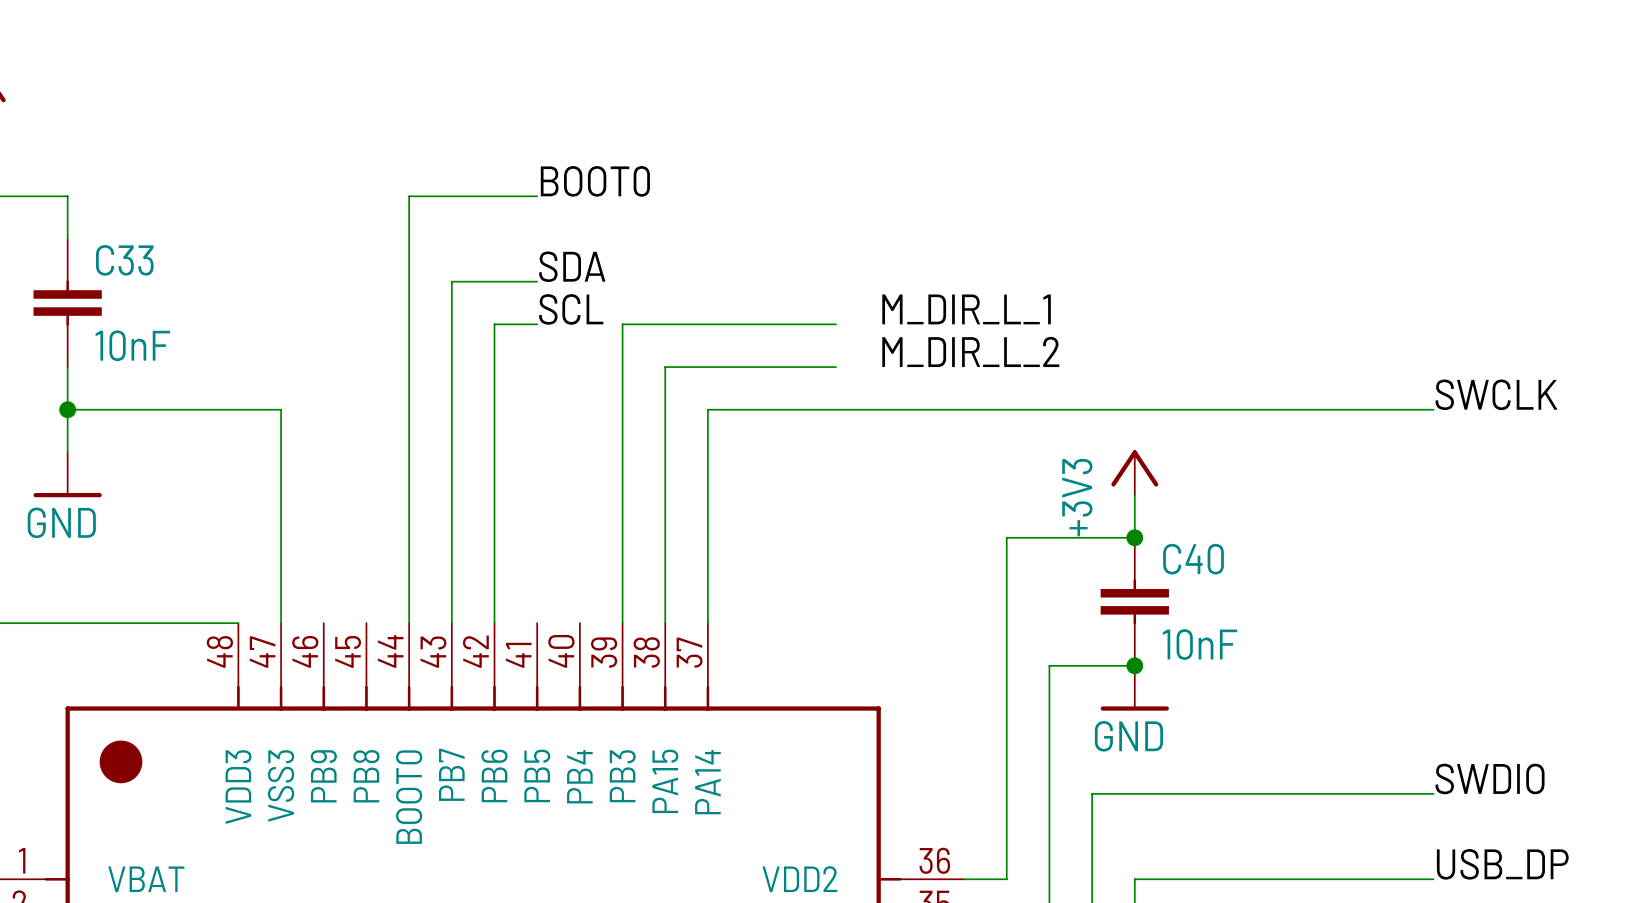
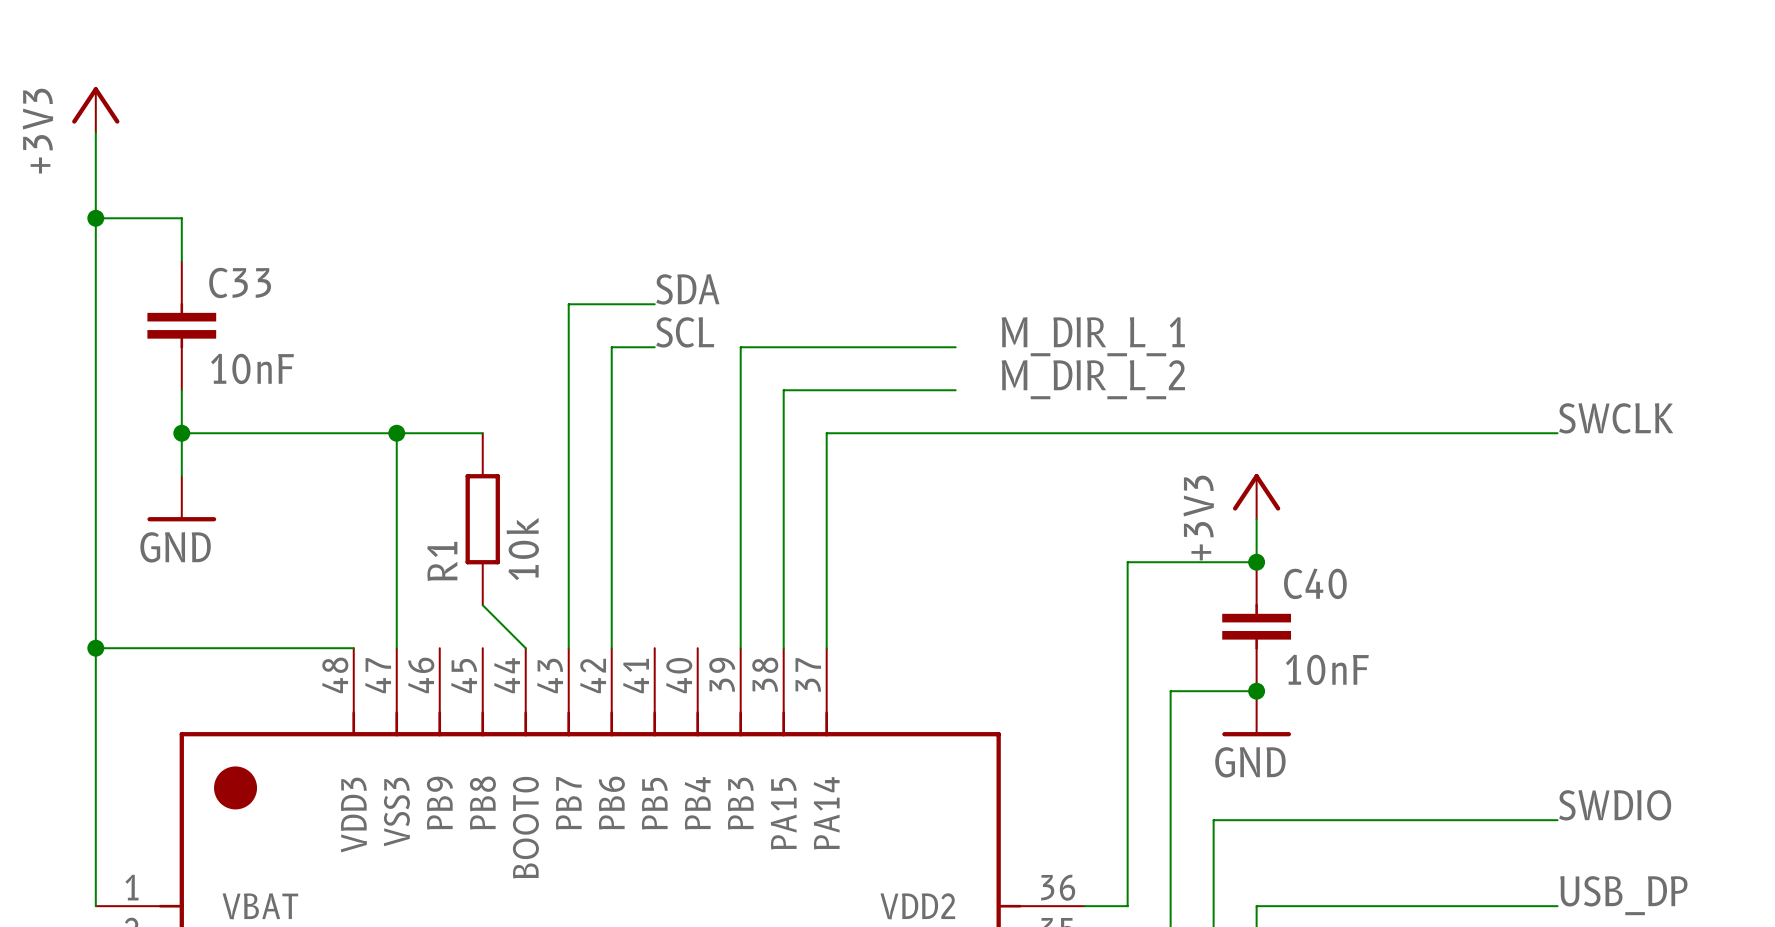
label: BOOT0 (595, 181) -> none
wire: (537, 196) (409, 196) (409, 623) -> (482, 605) (525, 648)
wire: none -> (396, 433) (482, 433)
junction: none -> (396, 433)
R1: none -> 10k (482, 519)

